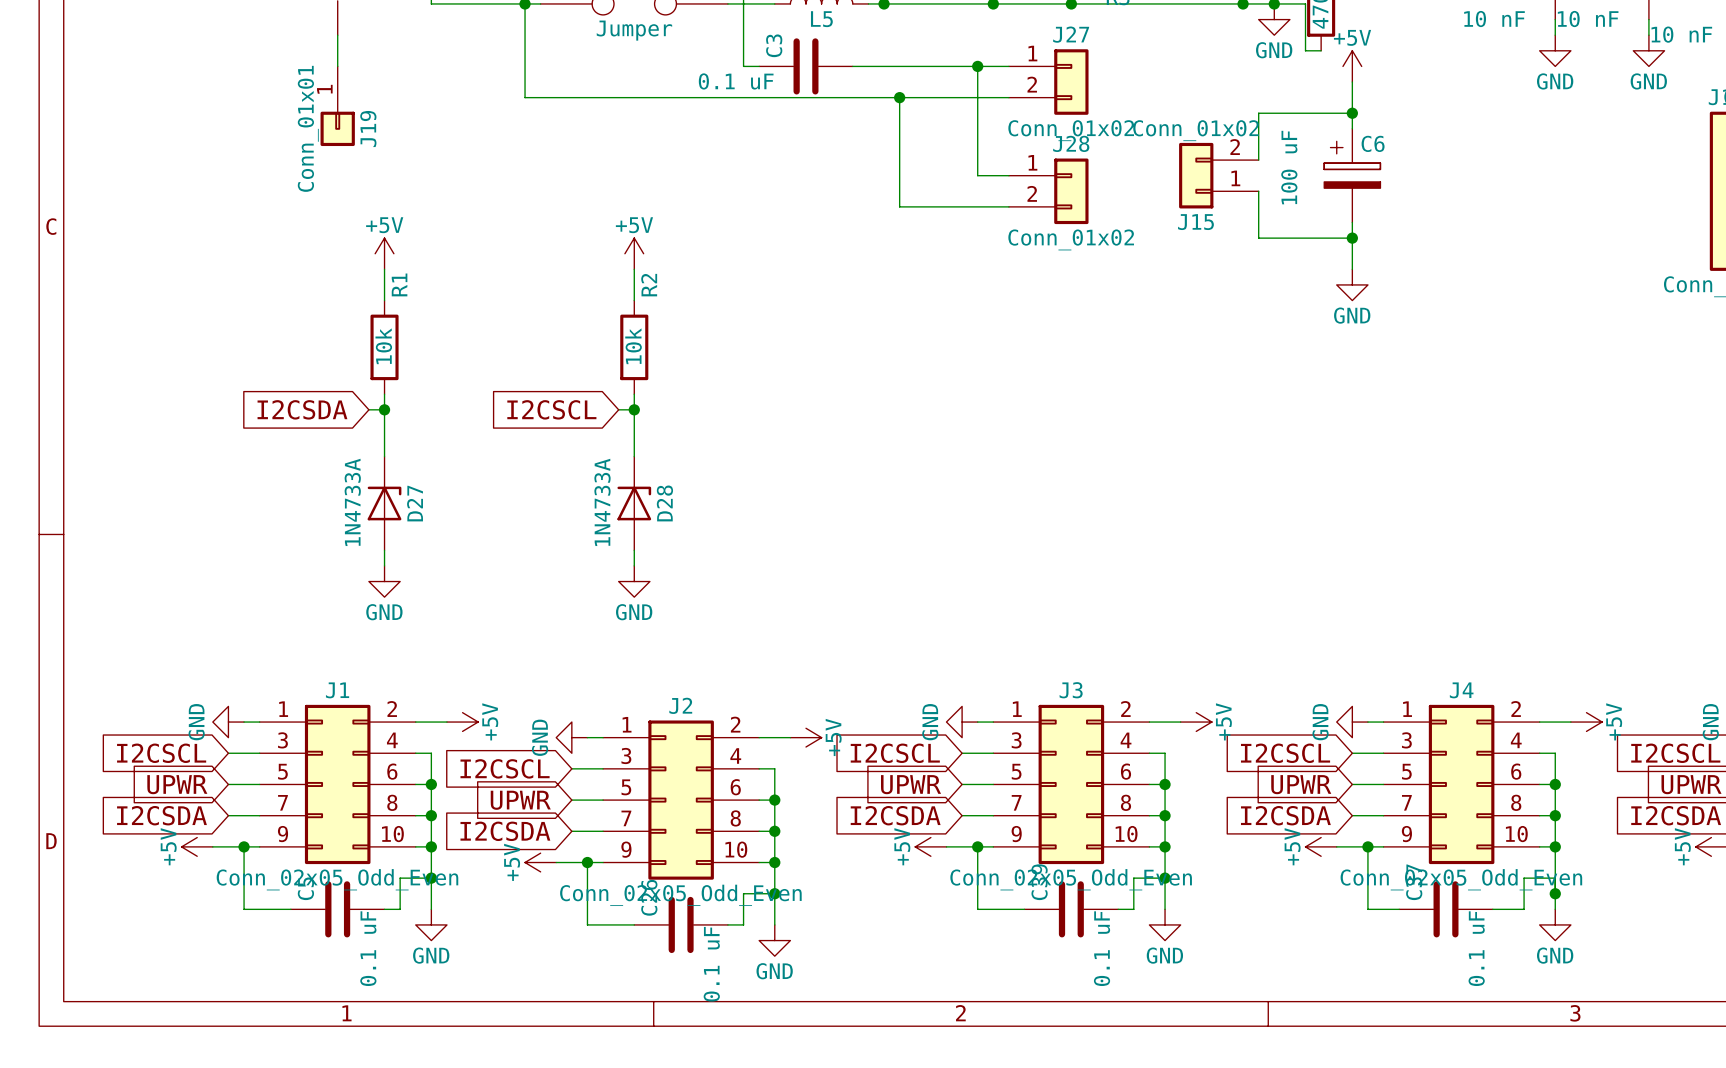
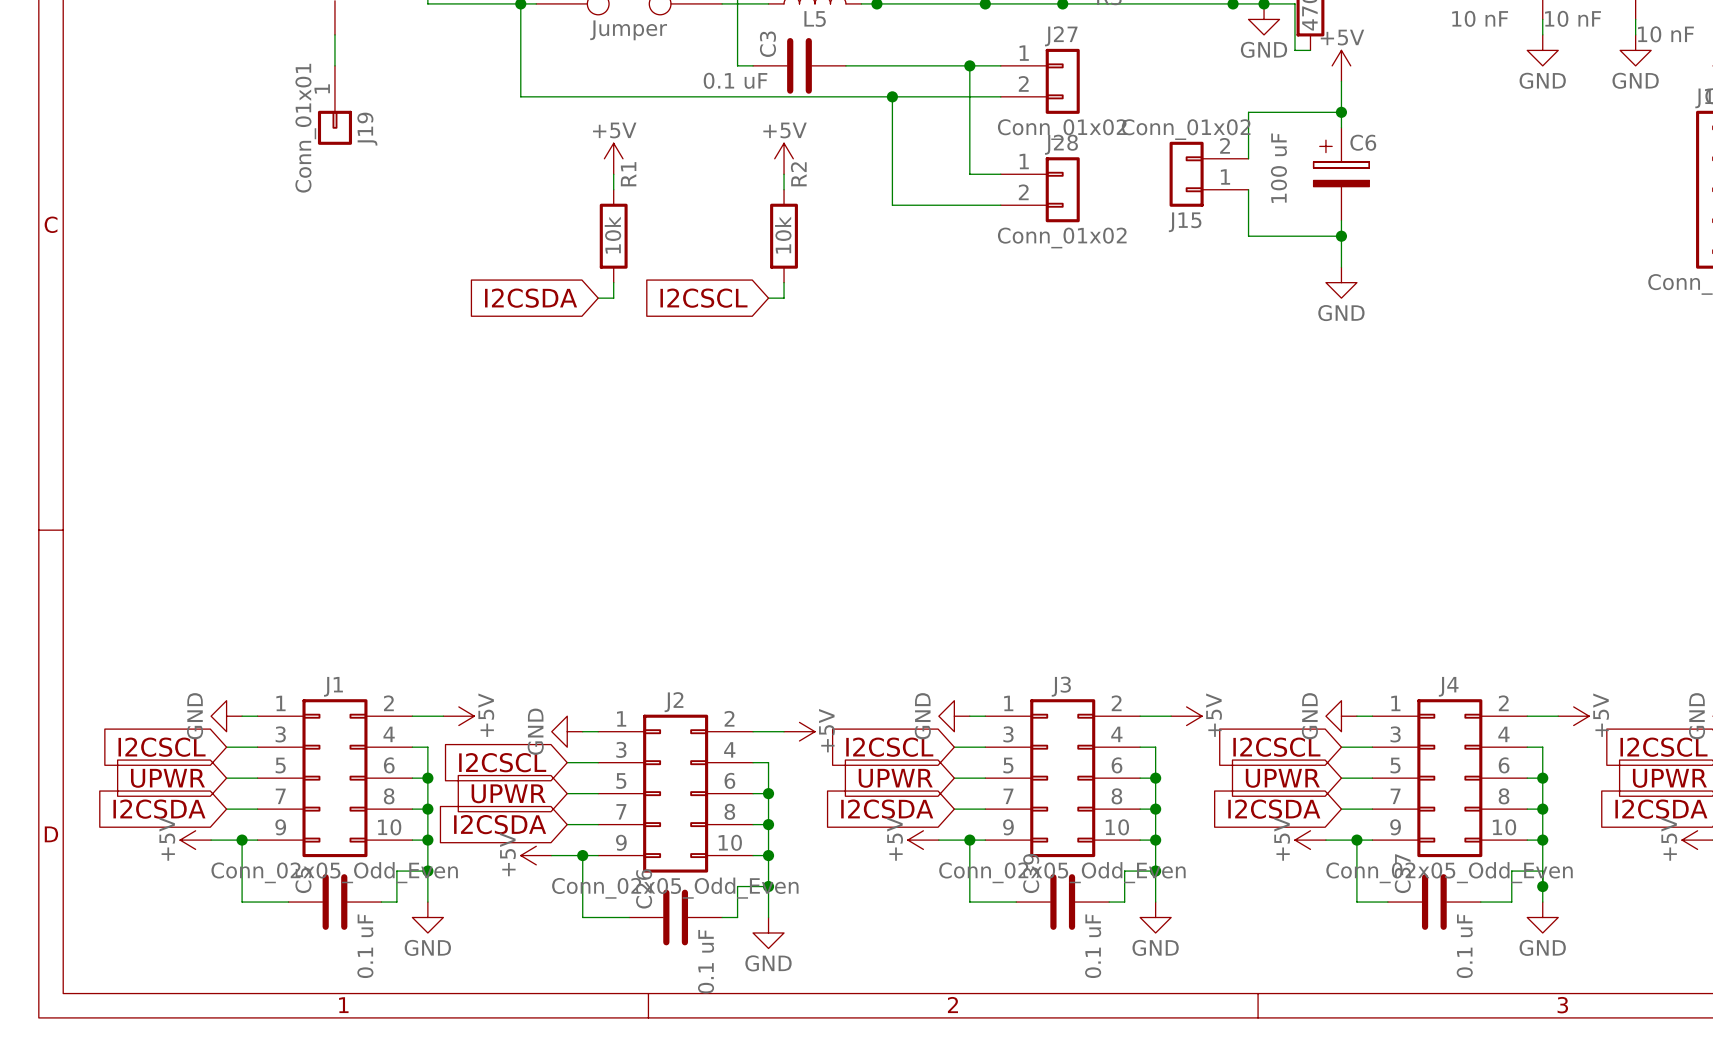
power symbol: none -> +5V (613, 158)
power symbol: none -> +5V (784, 158)
wire: none -> (613, 174) (613, 189)
wire: none -> (784, 174) (784, 189)
power symbol: +5V (384, 253) -> none
power symbol: +5V (634, 253) -> none
wire: (384, 269) (384, 300) -> none
wire: (634, 269) (634, 300) -> none
wire: none -> (613, 282) (613, 298) (598, 298)
wire: none -> (784, 282) (784, 298) (768, 298)
R1 position: (384, 347) -> (613, 236)
R2 position: (634, 347) -> (784, 236)
wire: (384, 394) (384, 456) -> none
wire: (634, 394) (634, 456) -> none
global label position: I2CSDA (302, 409) -> I2CSDA (531, 298)
wire: (368, 409) (384, 409) -> none
junction: (384, 409) -> none
global label position: I2CSCL (551, 409) -> I2CSCL (703, 298)
wire: (618, 409) (634, 409) -> none
junction: (634, 409) -> none
D27: 1N4733A (384, 503) -> none
D28: 1N4733A (634, 503) -> none
wire: (384, 550) (384, 565) -> none
wire: (634, 550) (634, 565) -> none
power symbol: GND (384, 581) -> none
power symbol: GND (634, 581) -> none

